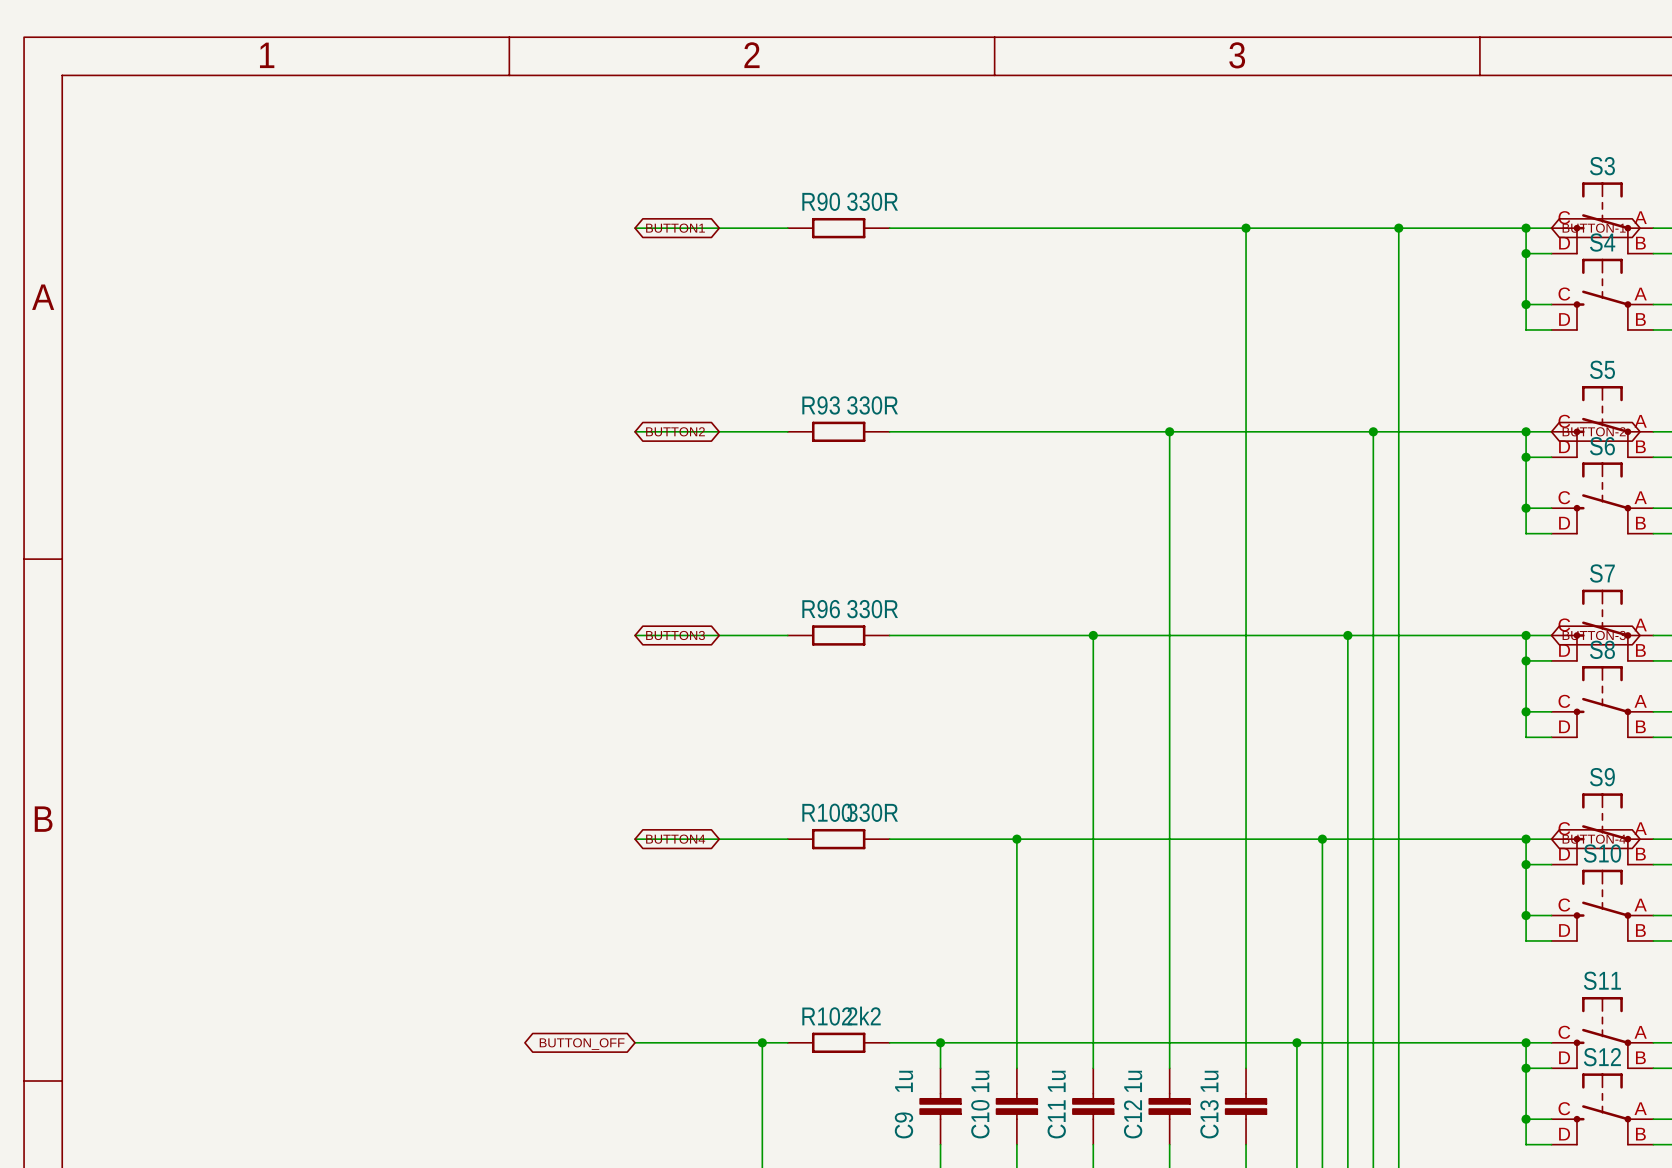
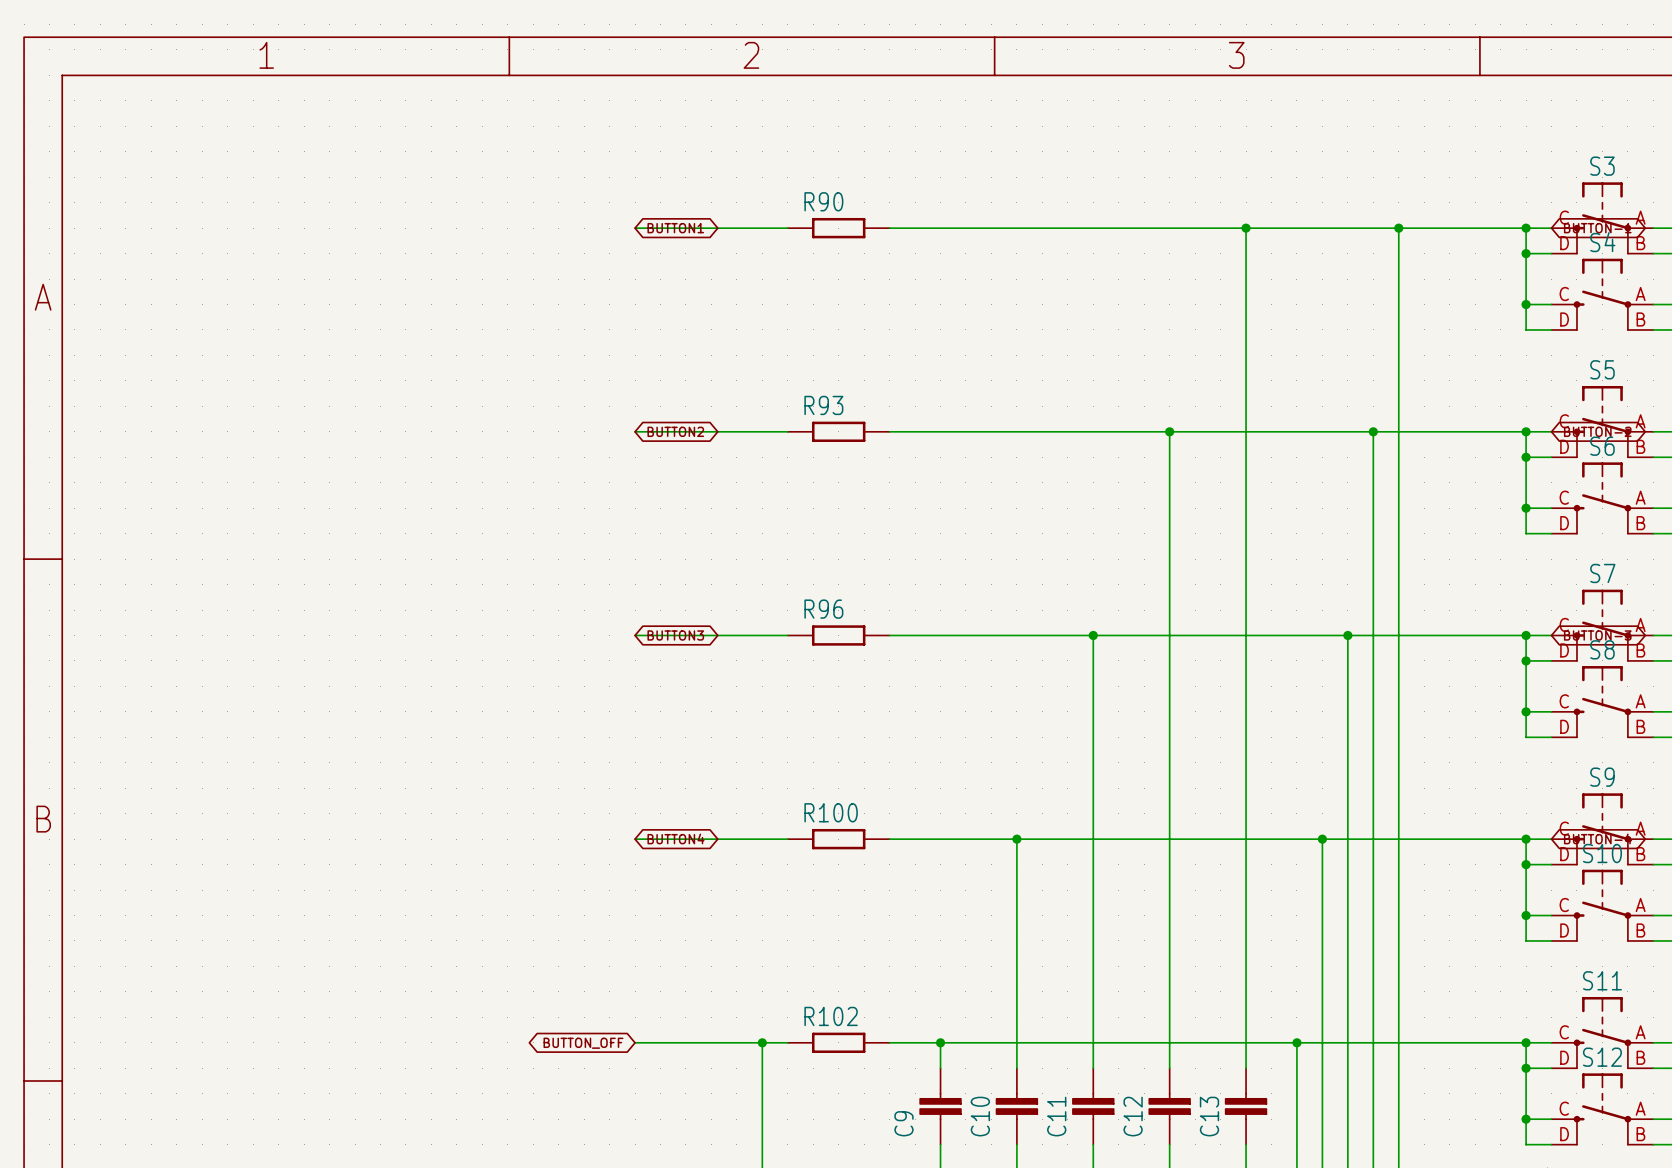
R90 value: 330R (872, 201) -> none
R93 value: 330R (872, 405) -> none
R96 value: 330R (872, 609) -> none
R100 value: 330R (872, 812) -> none
R102 value: 2k2 (864, 1015) -> none
C9 value: 1u (904, 1081) -> none
C10 value: 1u (980, 1081) -> none
C11 value: 1u (1056, 1081) -> none
C12 value: 1u (1133, 1081) -> none
C13 value: 1u (1209, 1081) -> none

